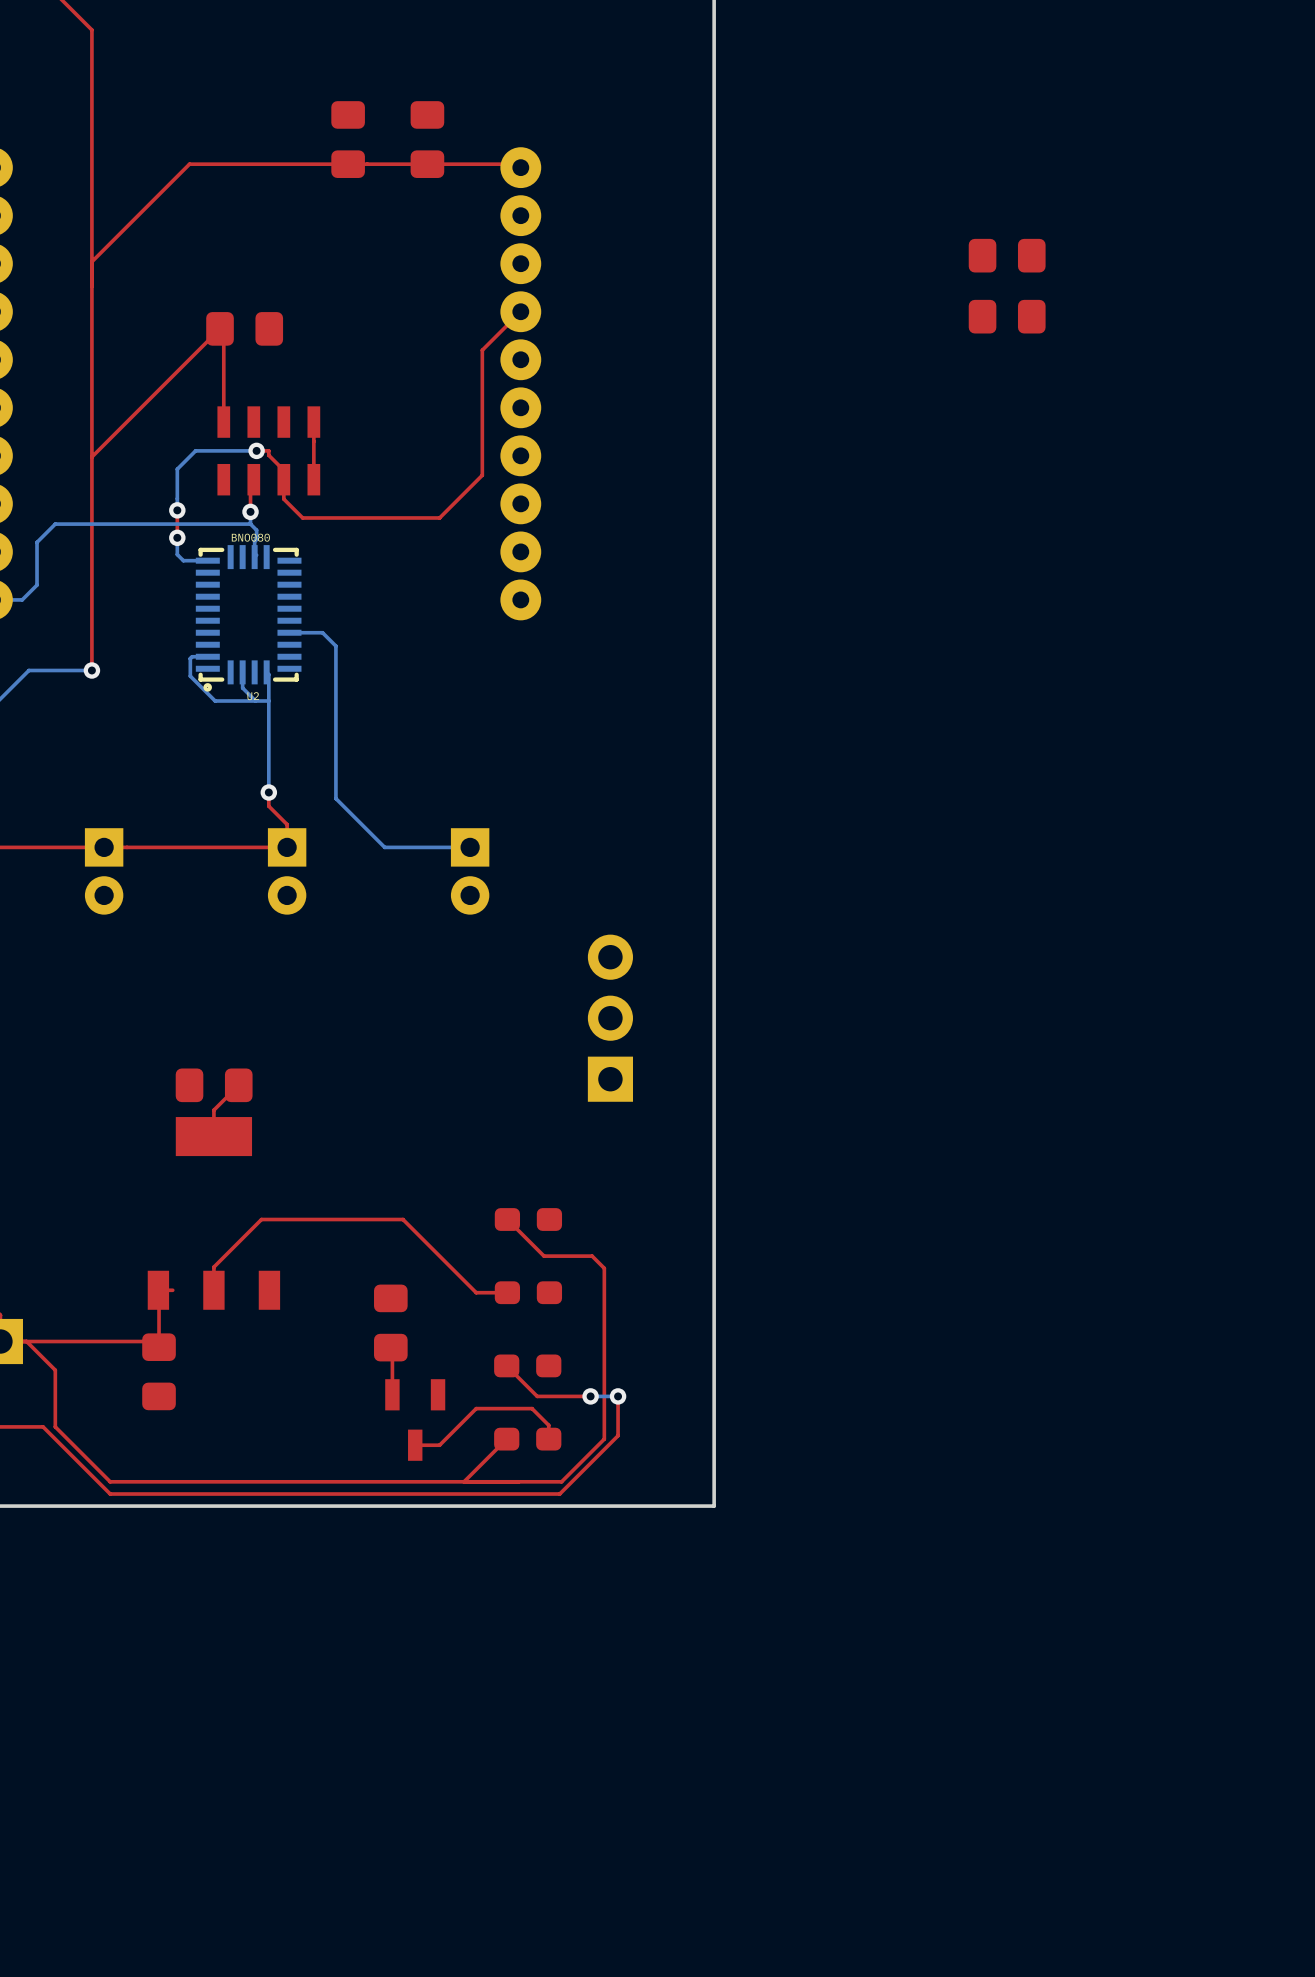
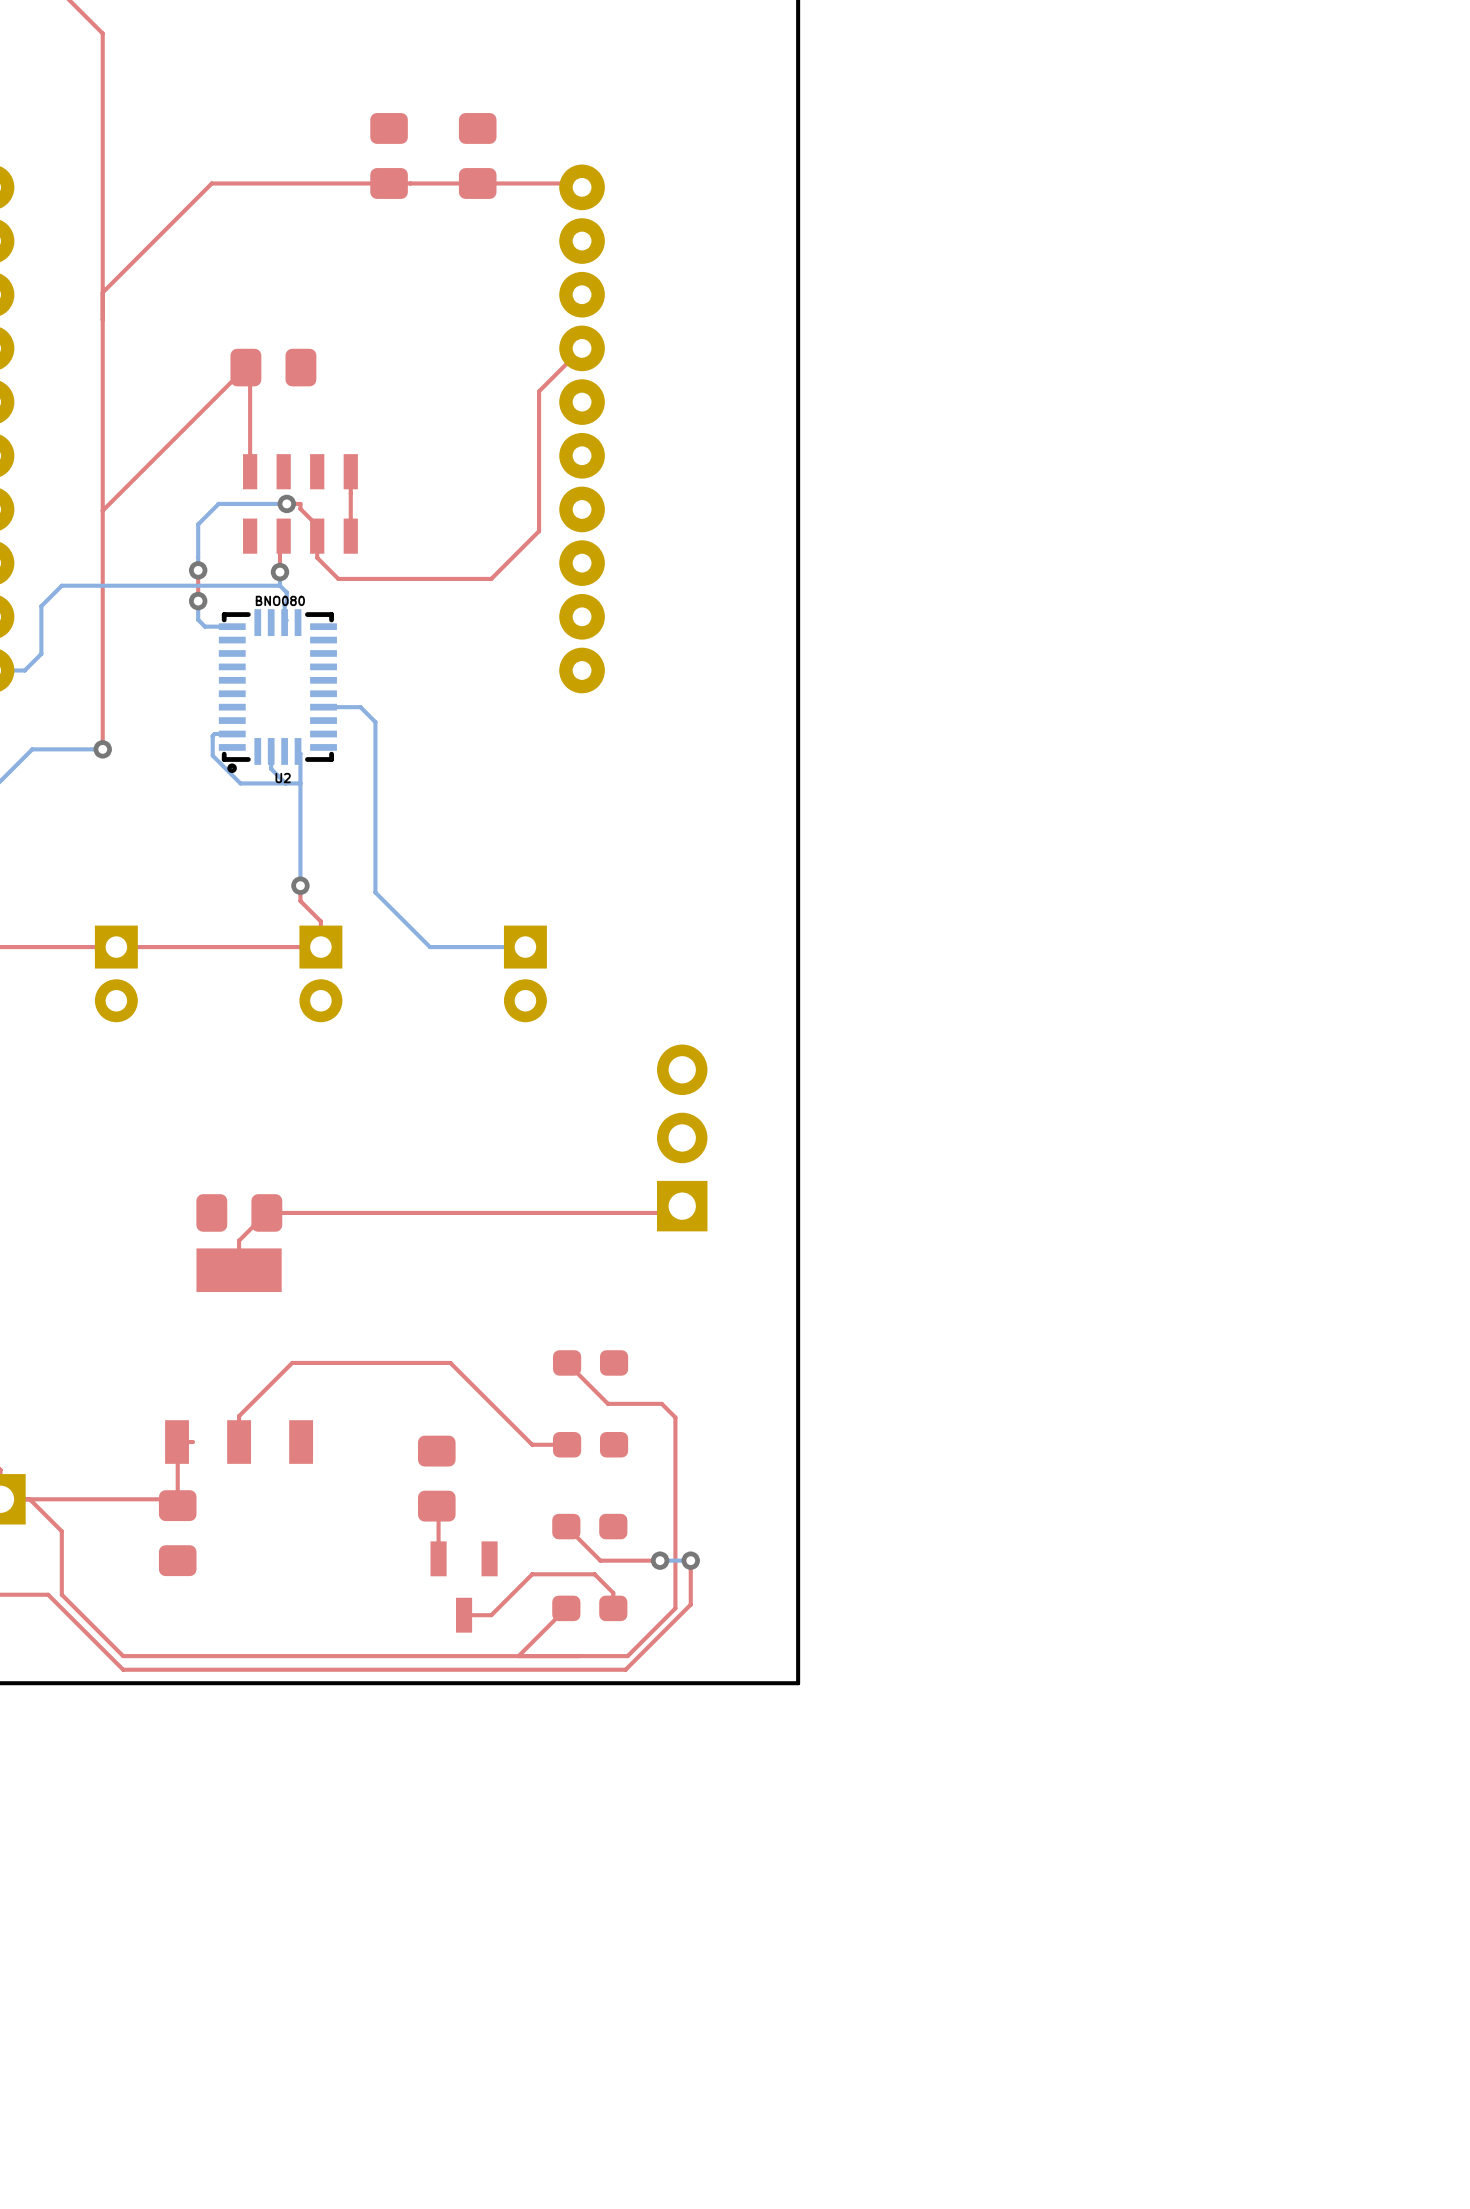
part: (1007, 255) -> none
part: (1007, 316) -> none
top track: none -> (682, 1206) (675, 1212) (266, 1212)

